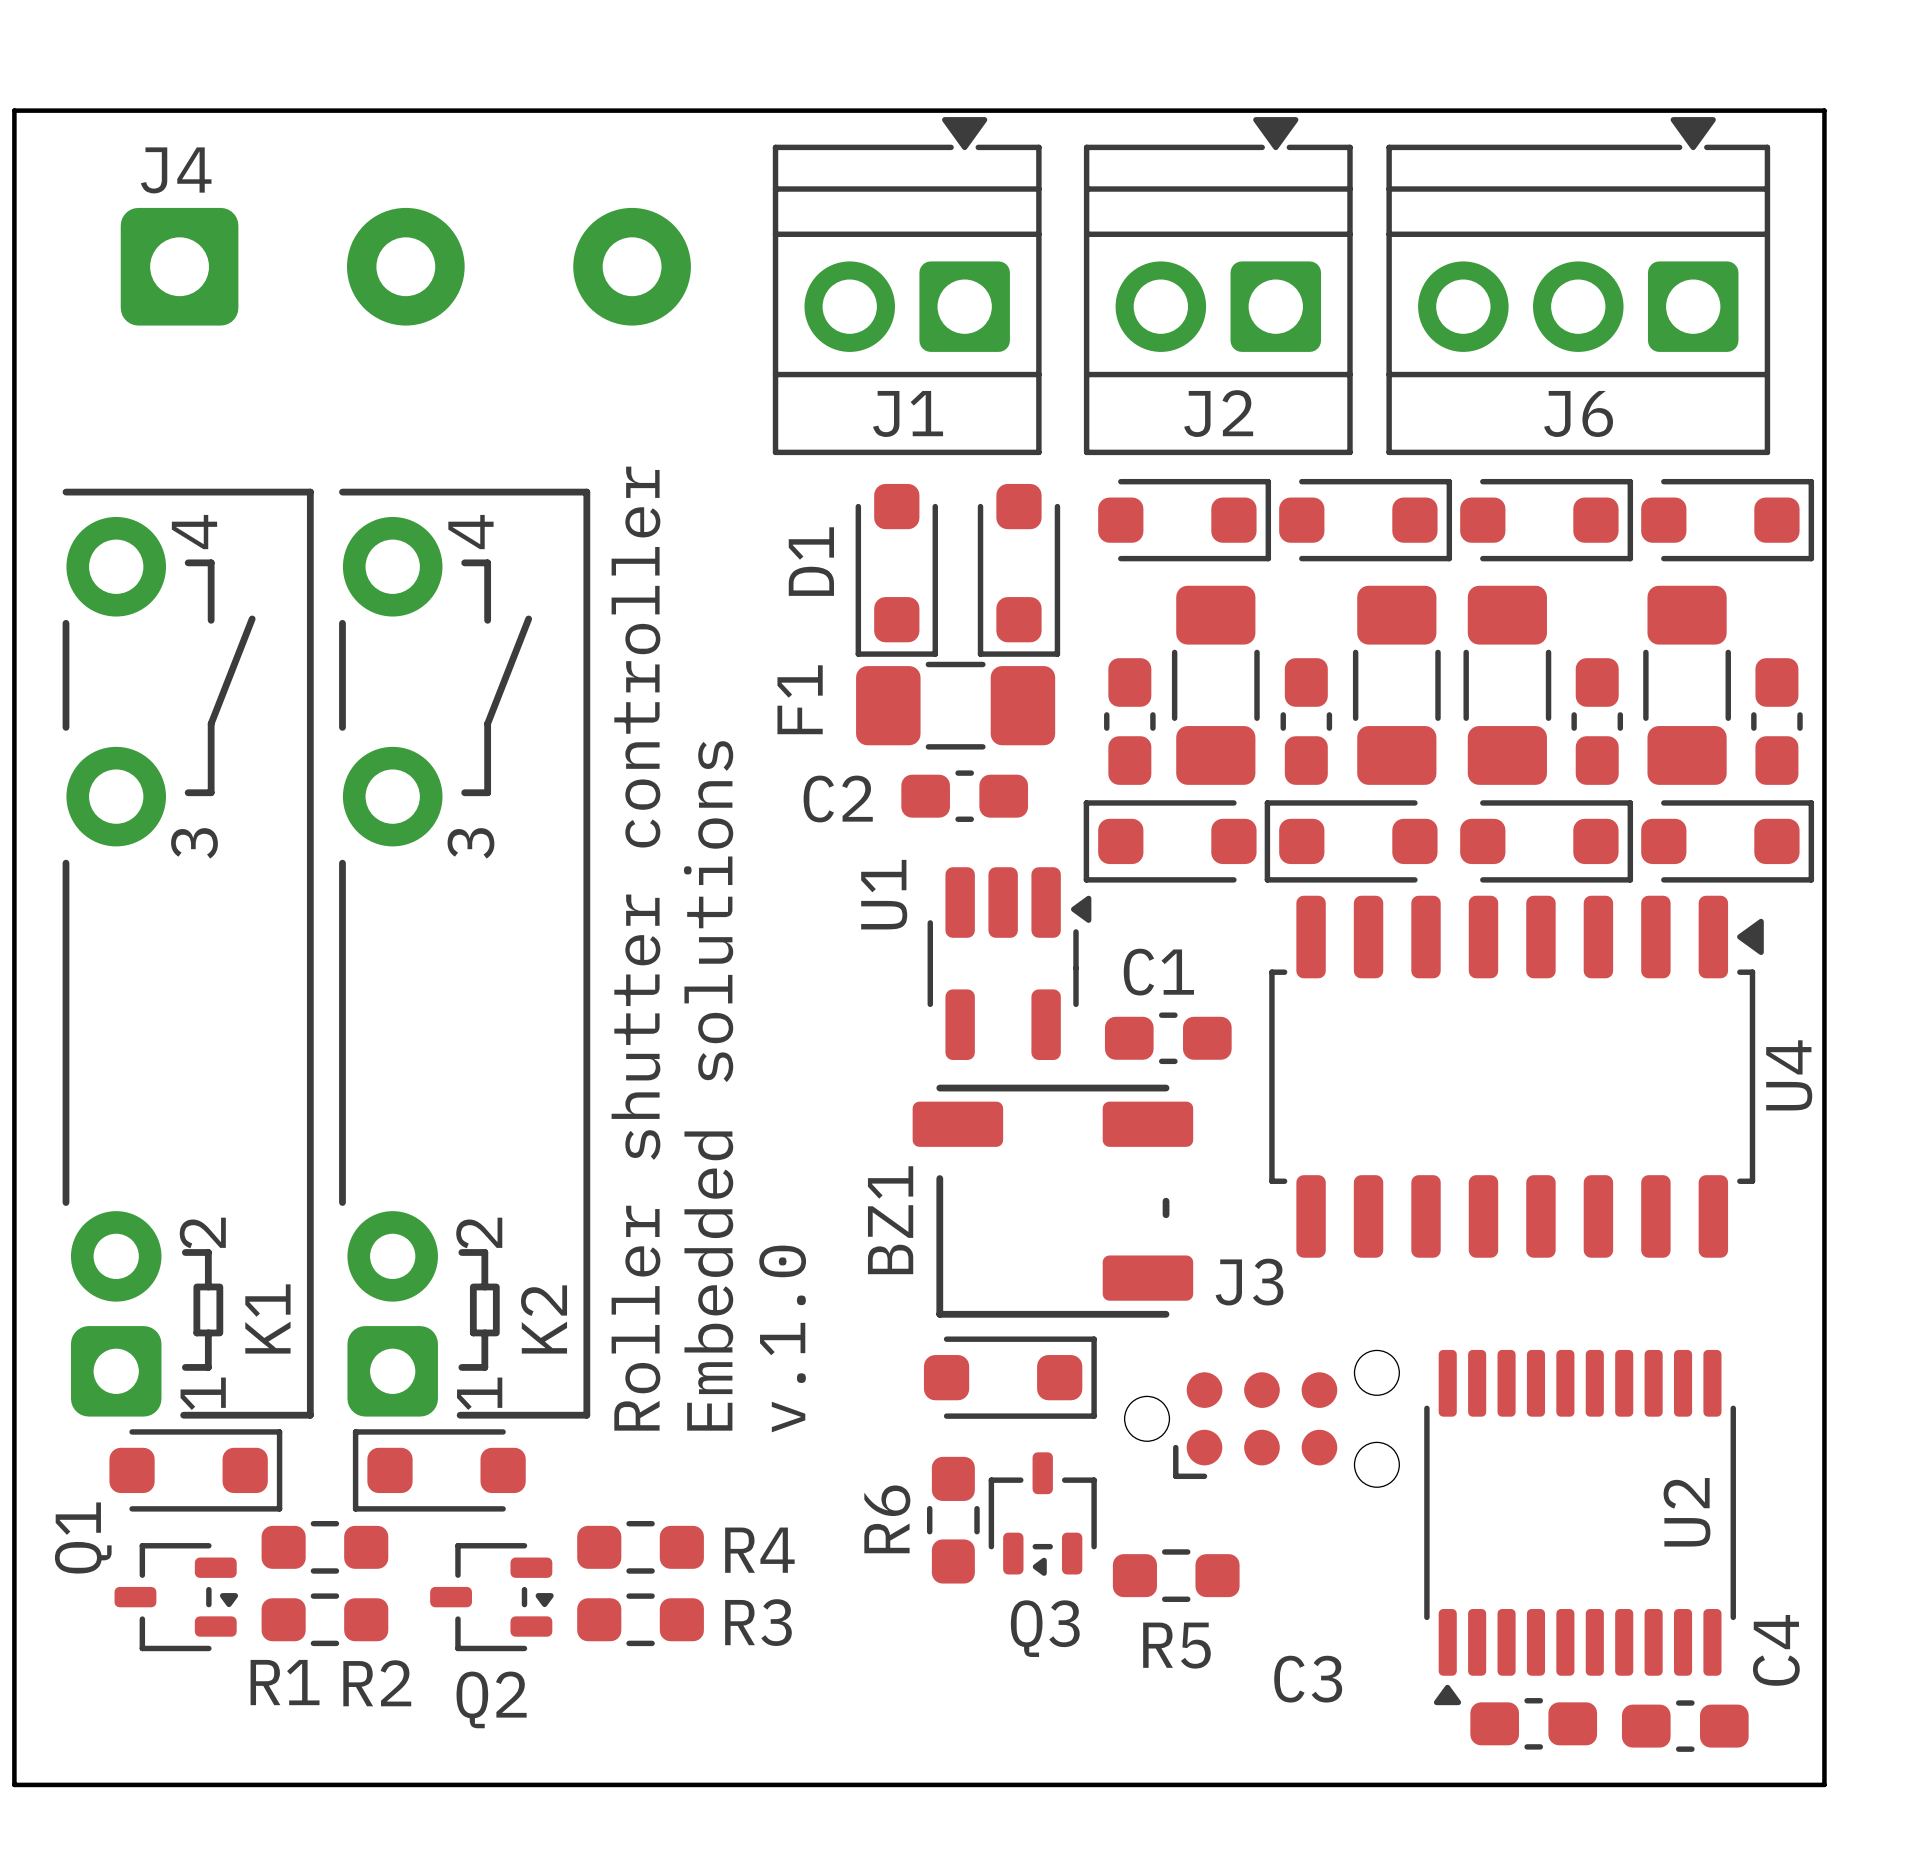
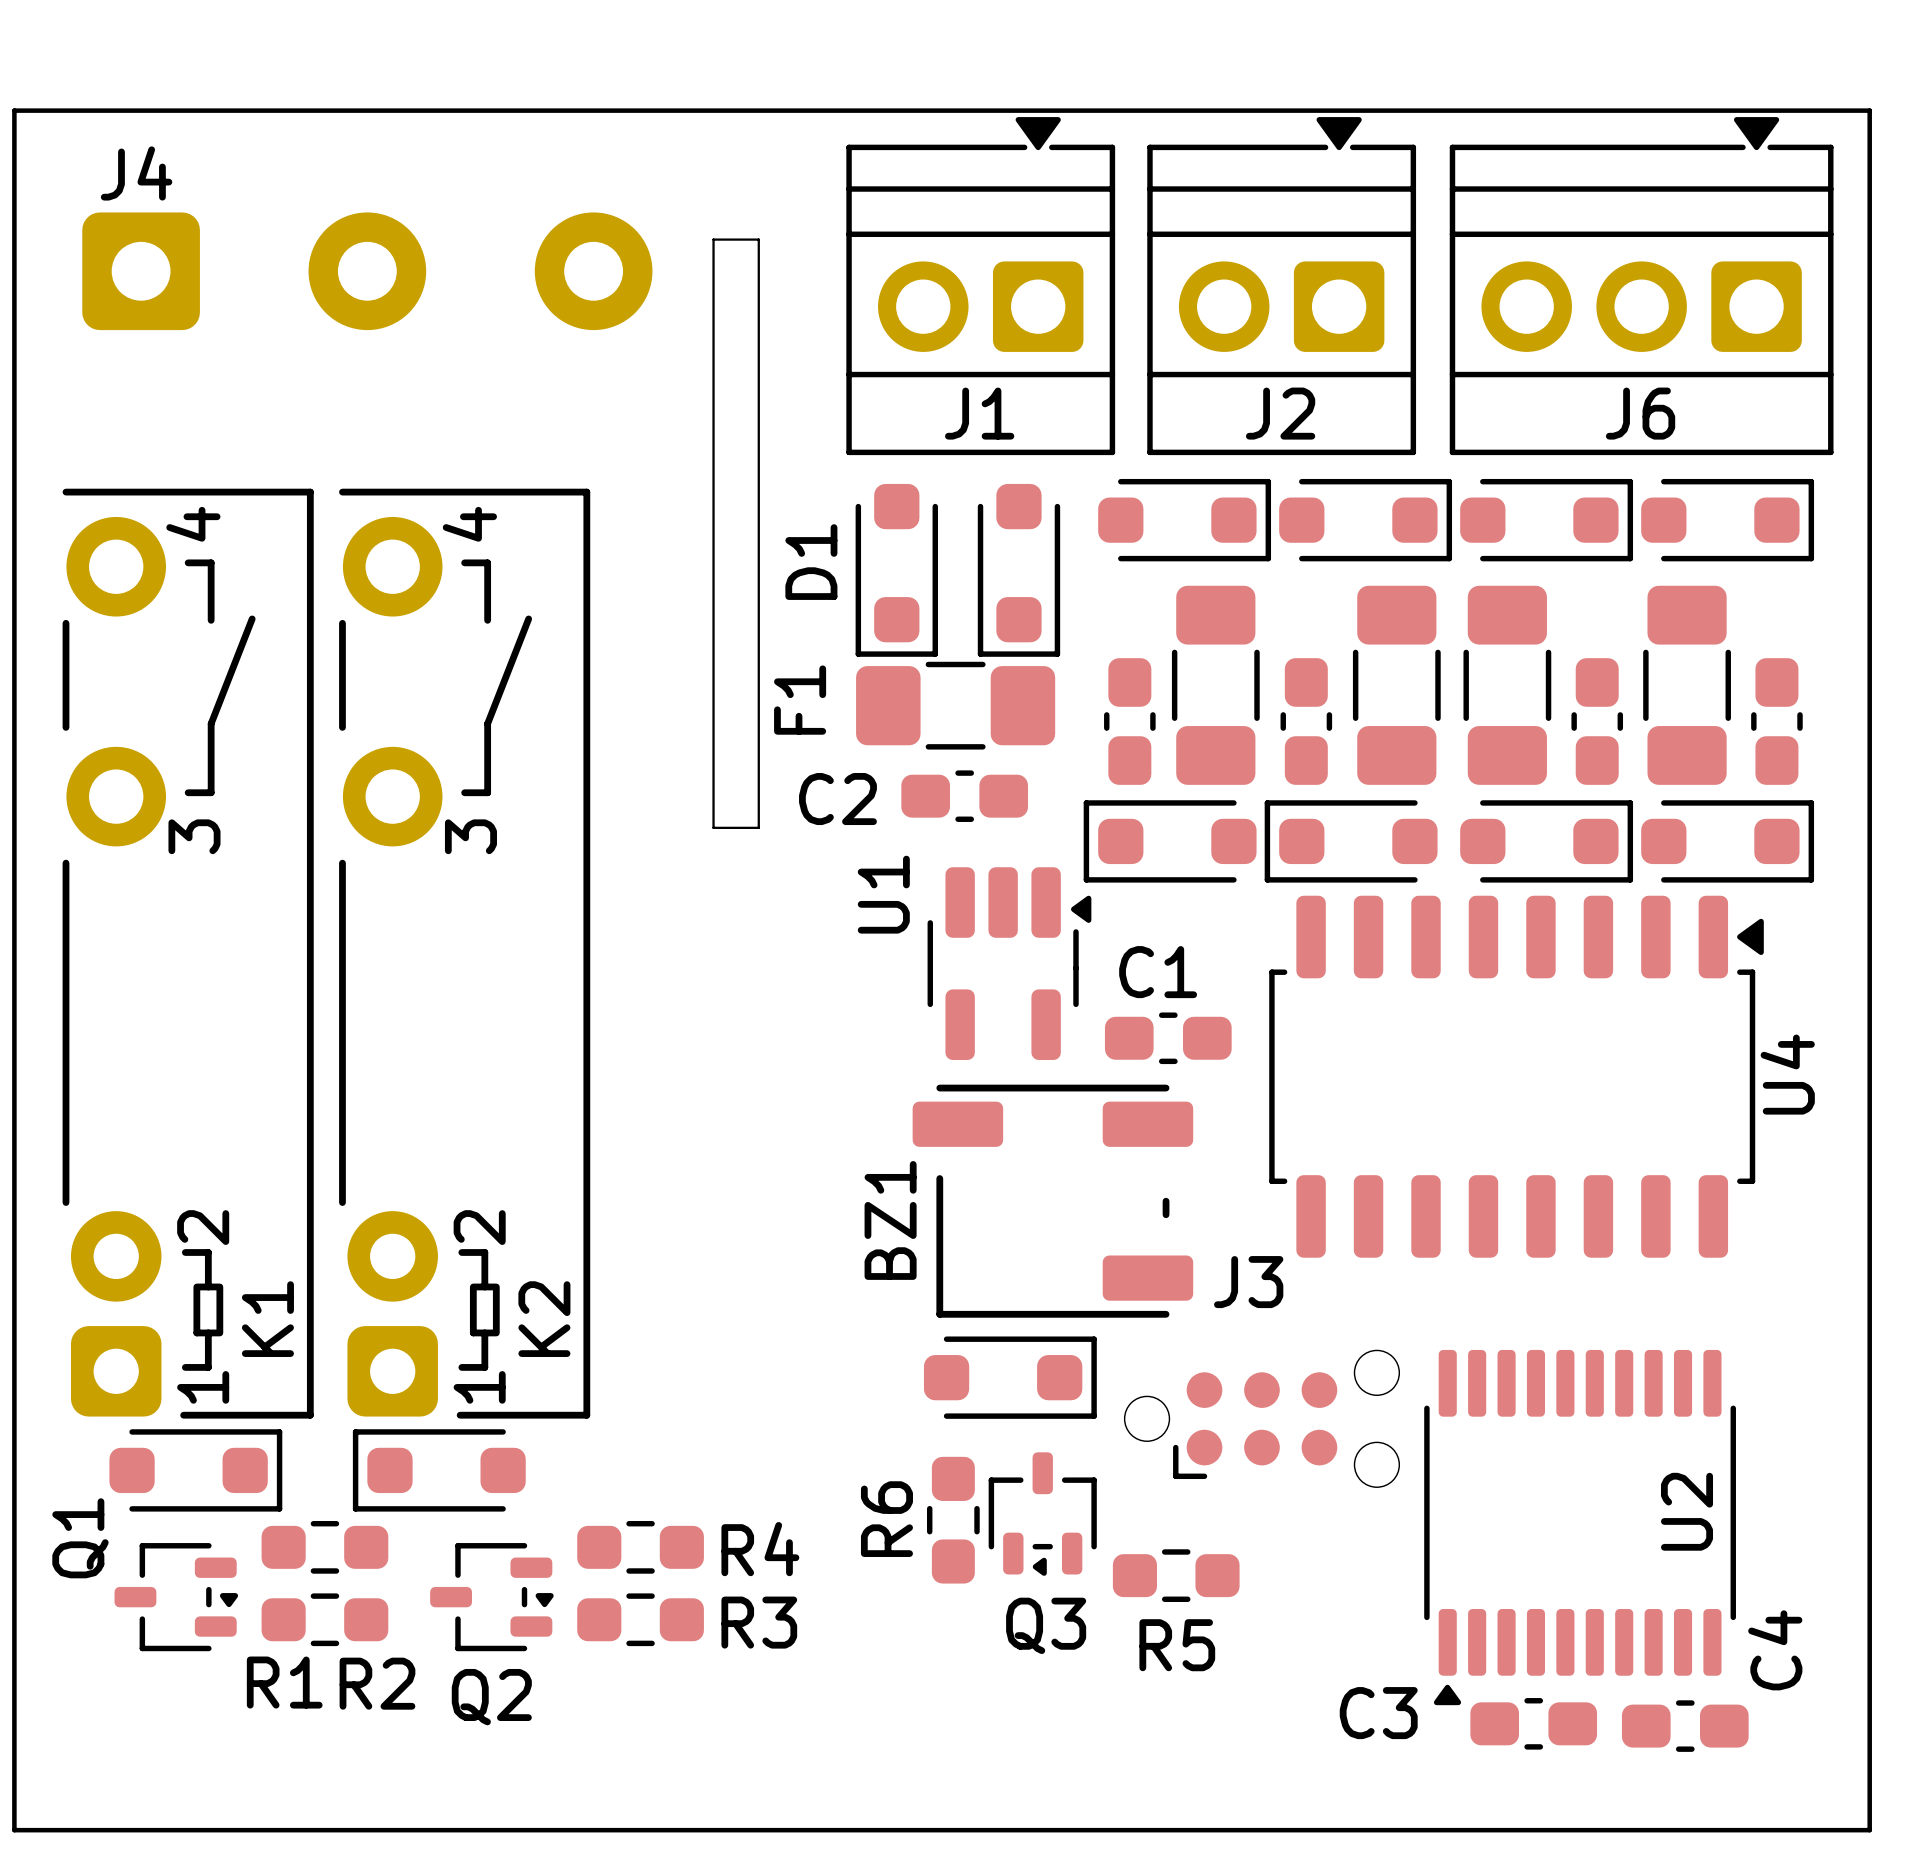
board edge: (1824, 110) (1824, 1784) (14, 1784) -> (1824, 110) (1869, 110) (1869, 1830) (14, 1830) (14, 1784)
board edge: none -> (713, 239) (758, 239) (758, 827) (713, 827) (713, 239)
J4 position: (405, 266) -> (367, 271)
J1 position: (907, 286) -> (980, 286)
J2 position: (1218, 286) -> (1281, 286)
J6 position: (1578, 286) -> (1641, 286)
text: Roller shutter controller (635, 948) -> none
text: Embedded solutions (708, 1085) -> none
text: v.1.0 (782, 1338) -> none
C3 name position: C3 (1308, 1679) -> C3 (1378, 1713)

